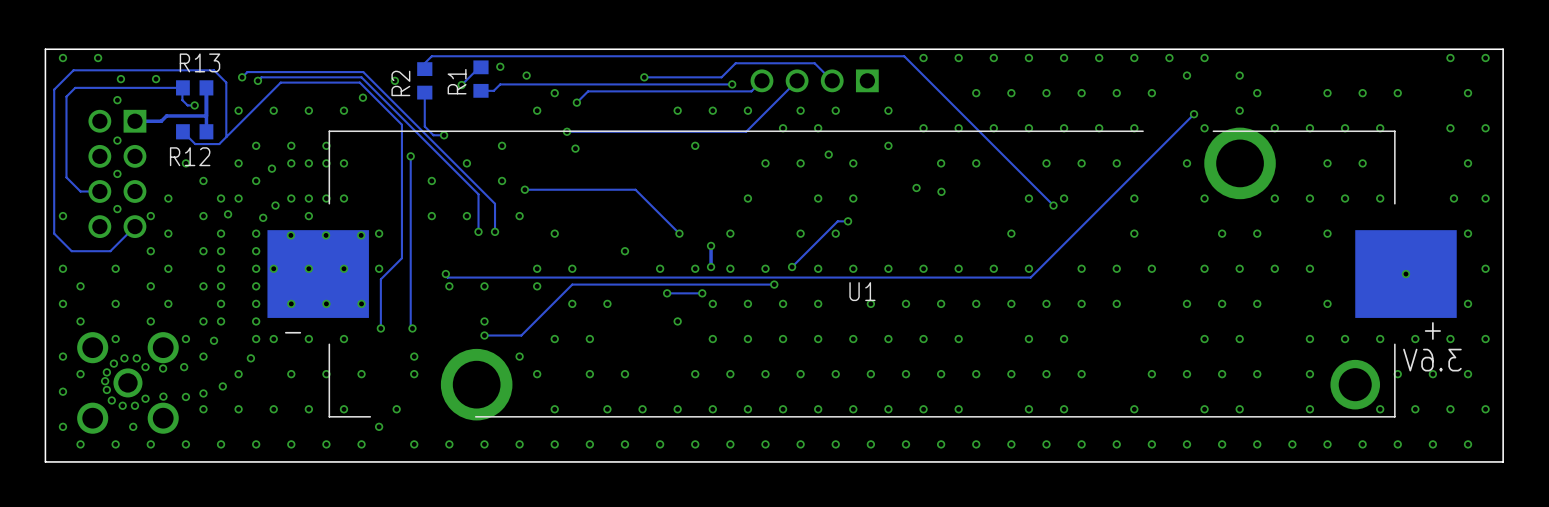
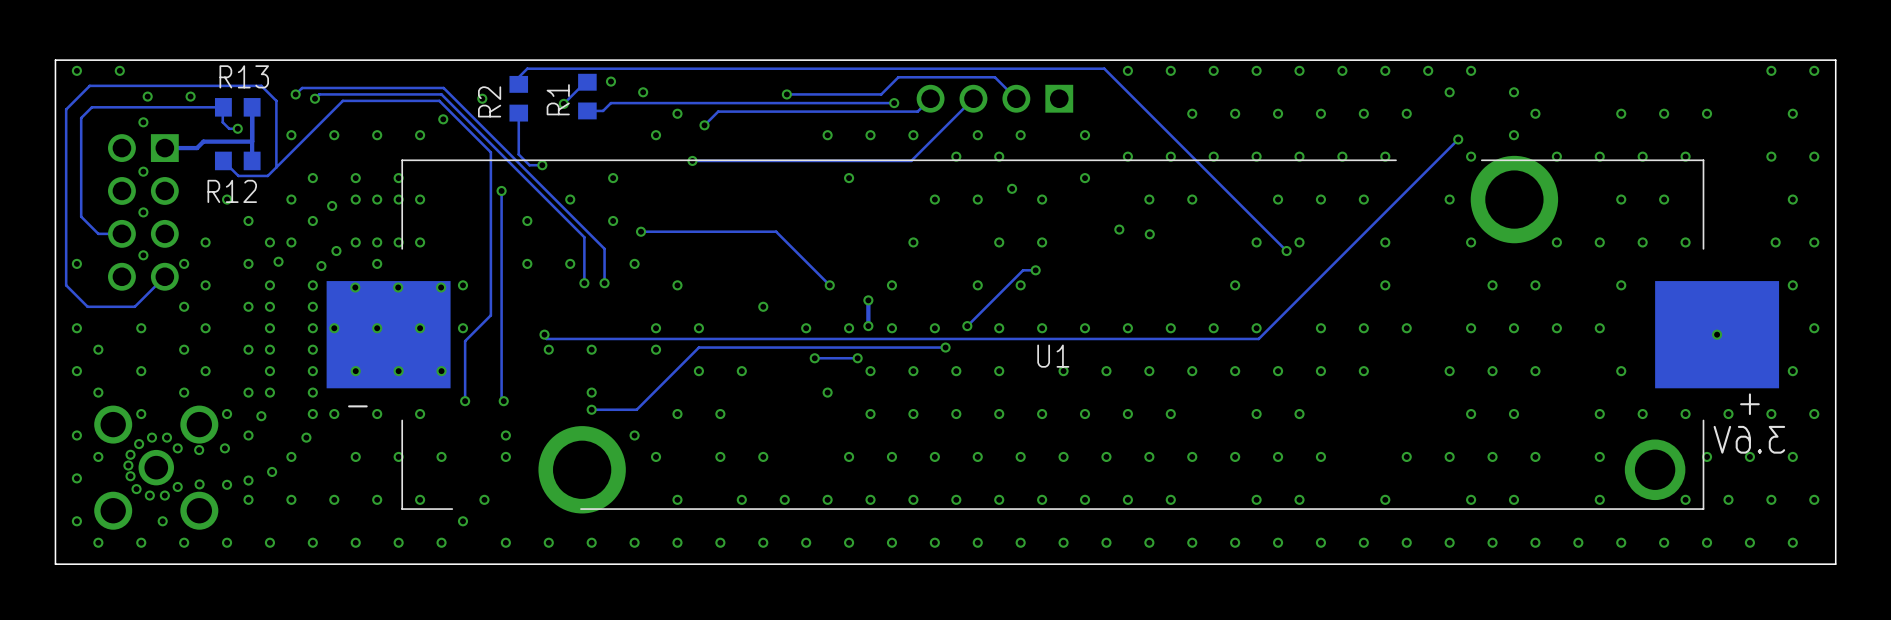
via: (575, 148) -> none

